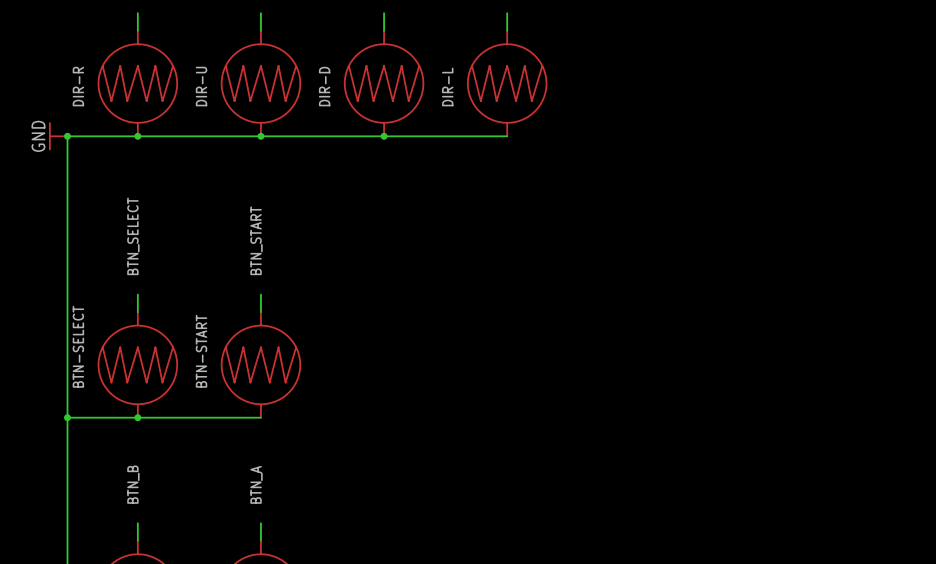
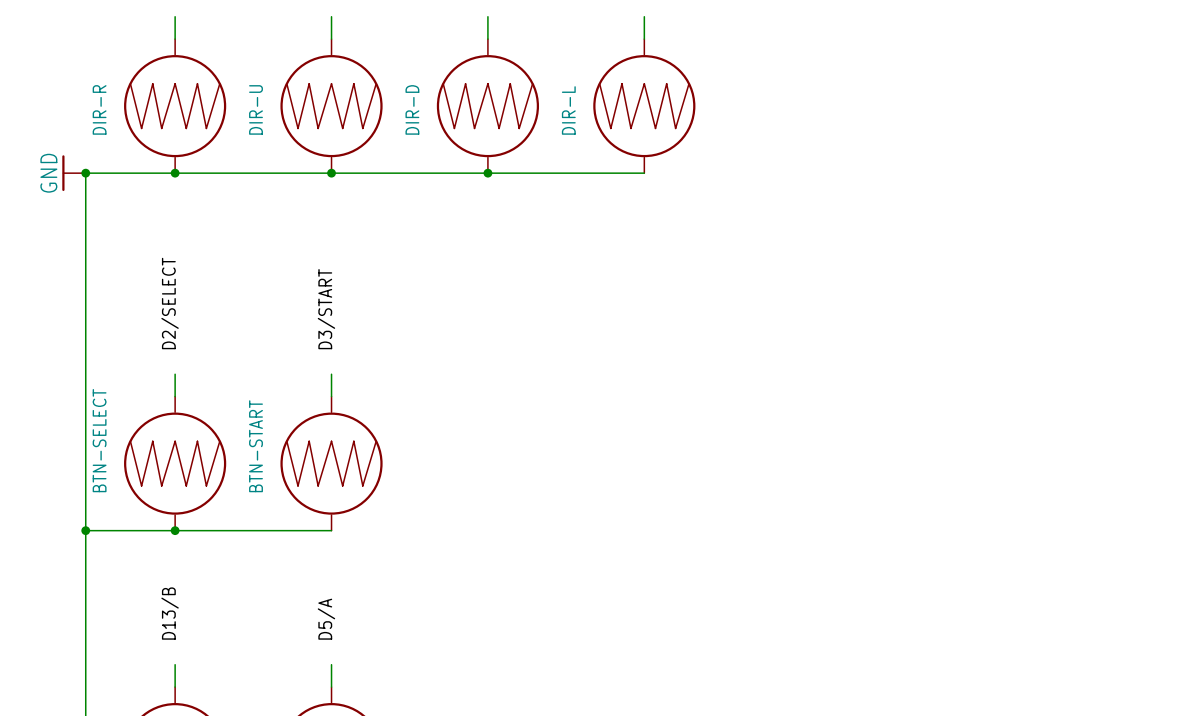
label: BTN_SELECT (133, 236) -> D2/SELECT (170, 303)
label: BTN_START (256, 240) -> D3/START (326, 309)
label: BTN_B (133, 484) -> D13/B (170, 613)
label: BTN_A (256, 484) -> D5/A (326, 619)

